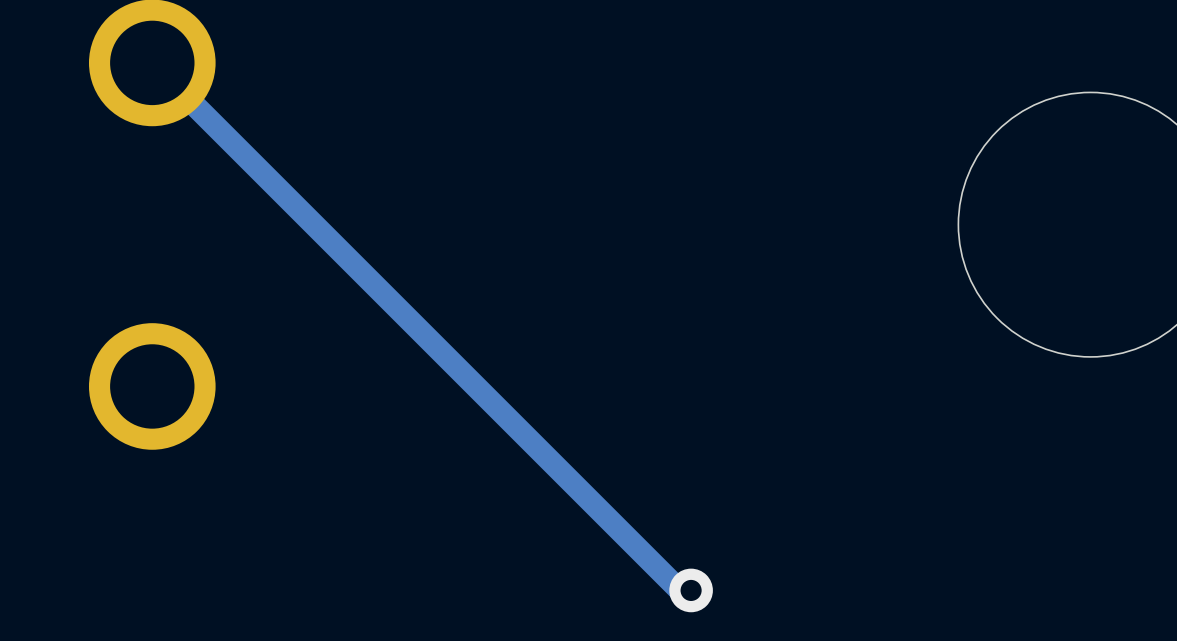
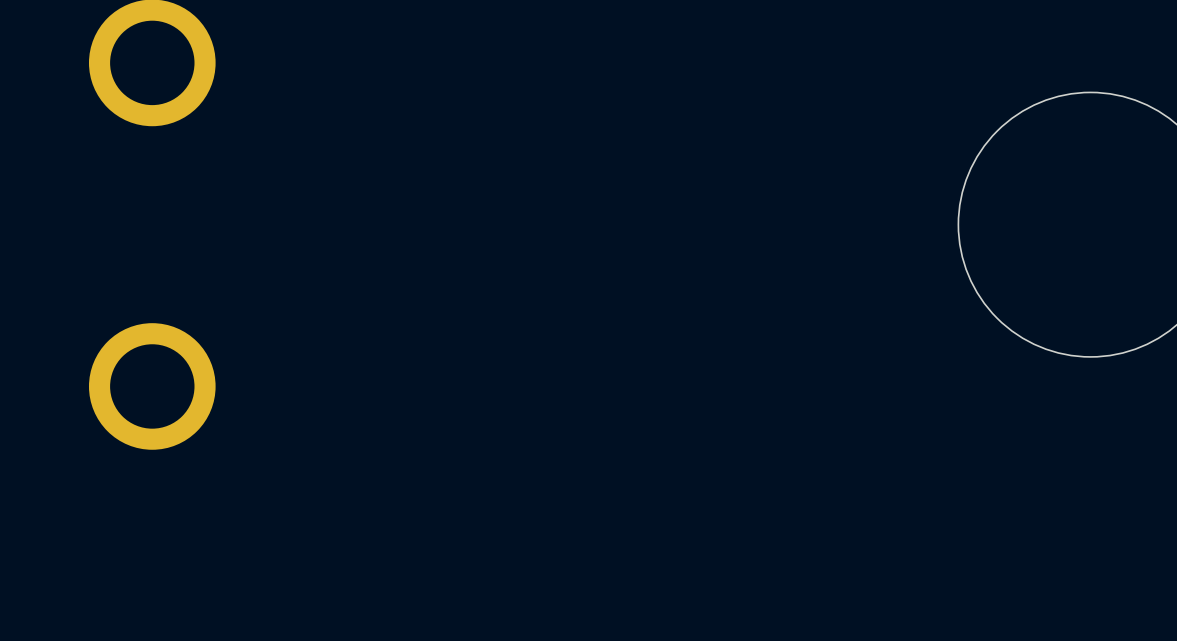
track: (152, 62) (679, 590) (691, 590) -> none
via: (691, 590) -> none

